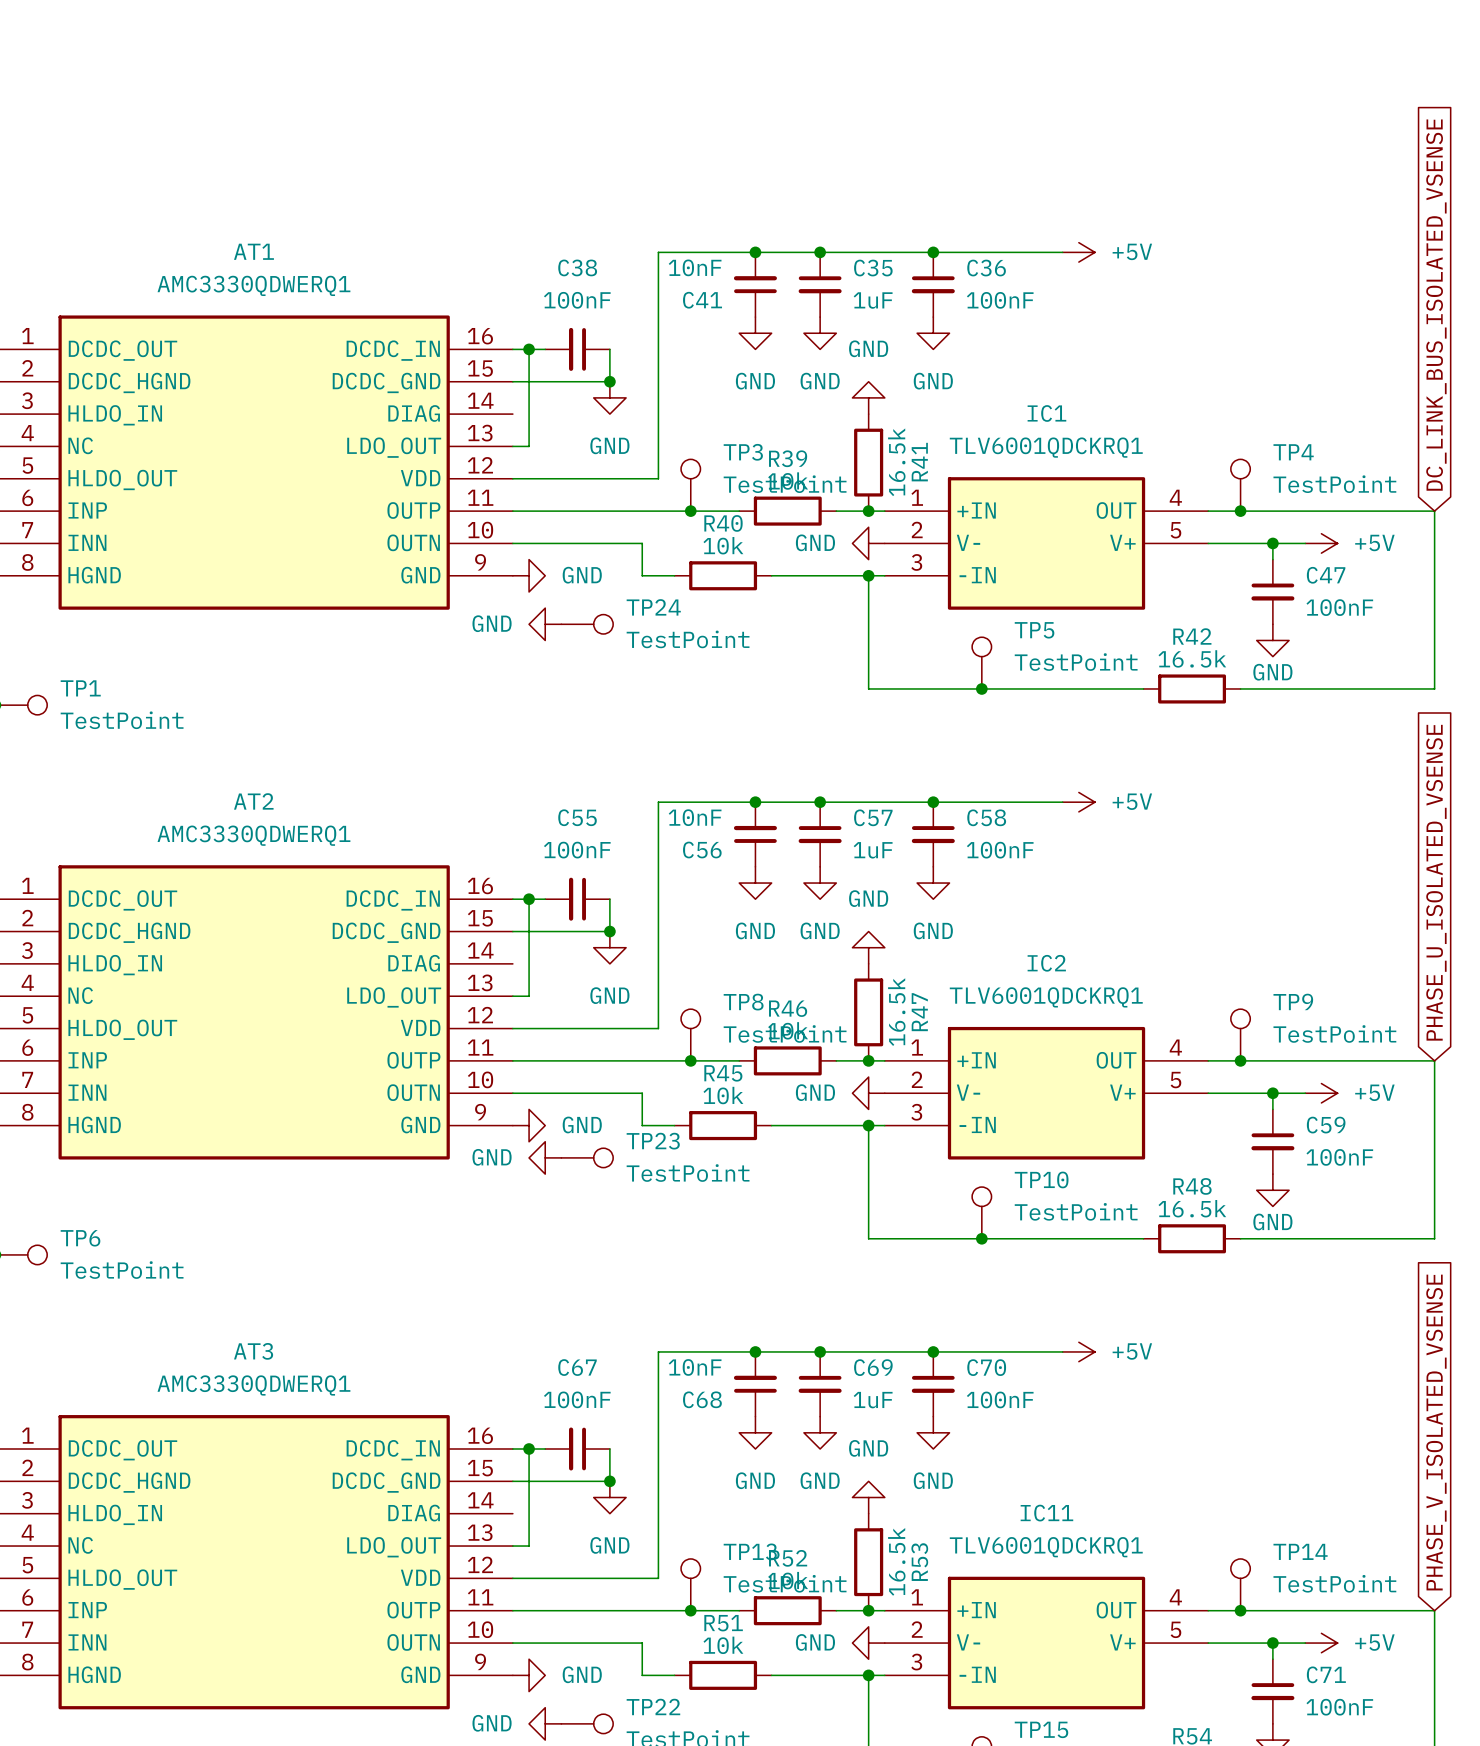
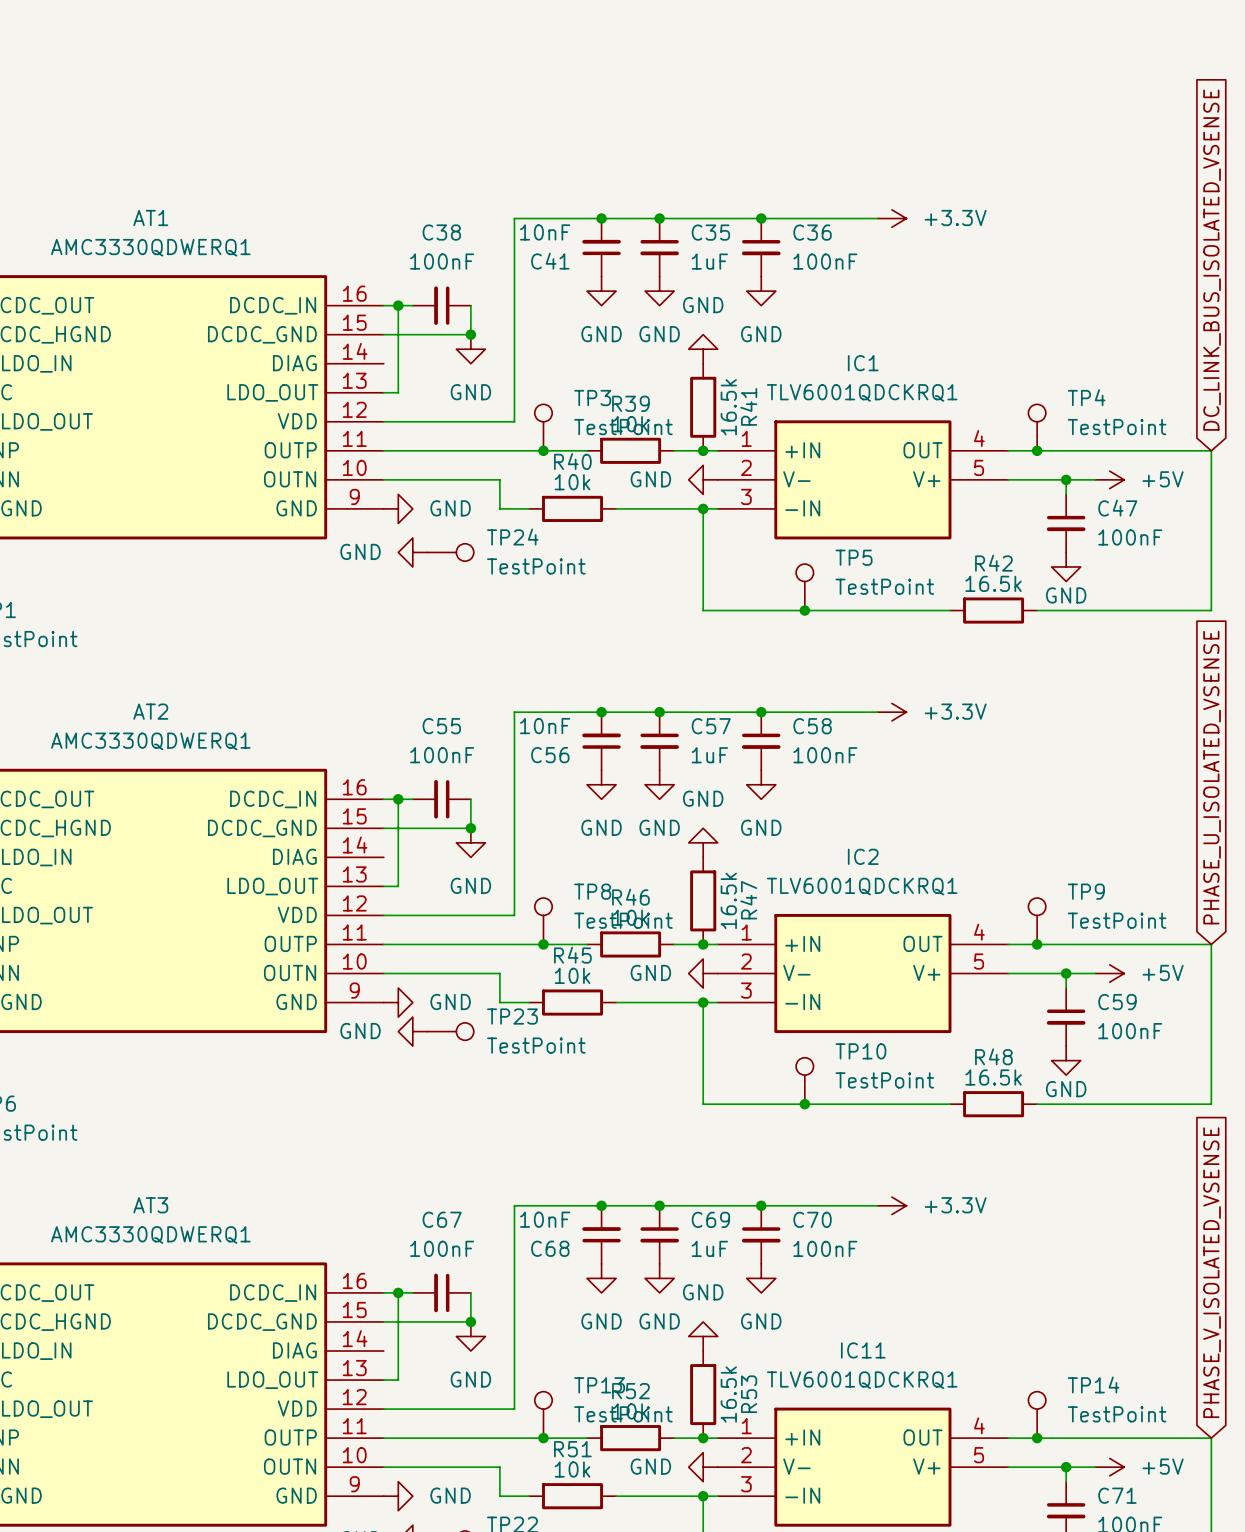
power symbol: +5V (1078, 252) -> +3.3V (891, 218)
power symbol: +5V (1078, 802) -> +3.3V (891, 712)
power symbol: +5V (1078, 1351) -> +3.3V (891, 1205)

